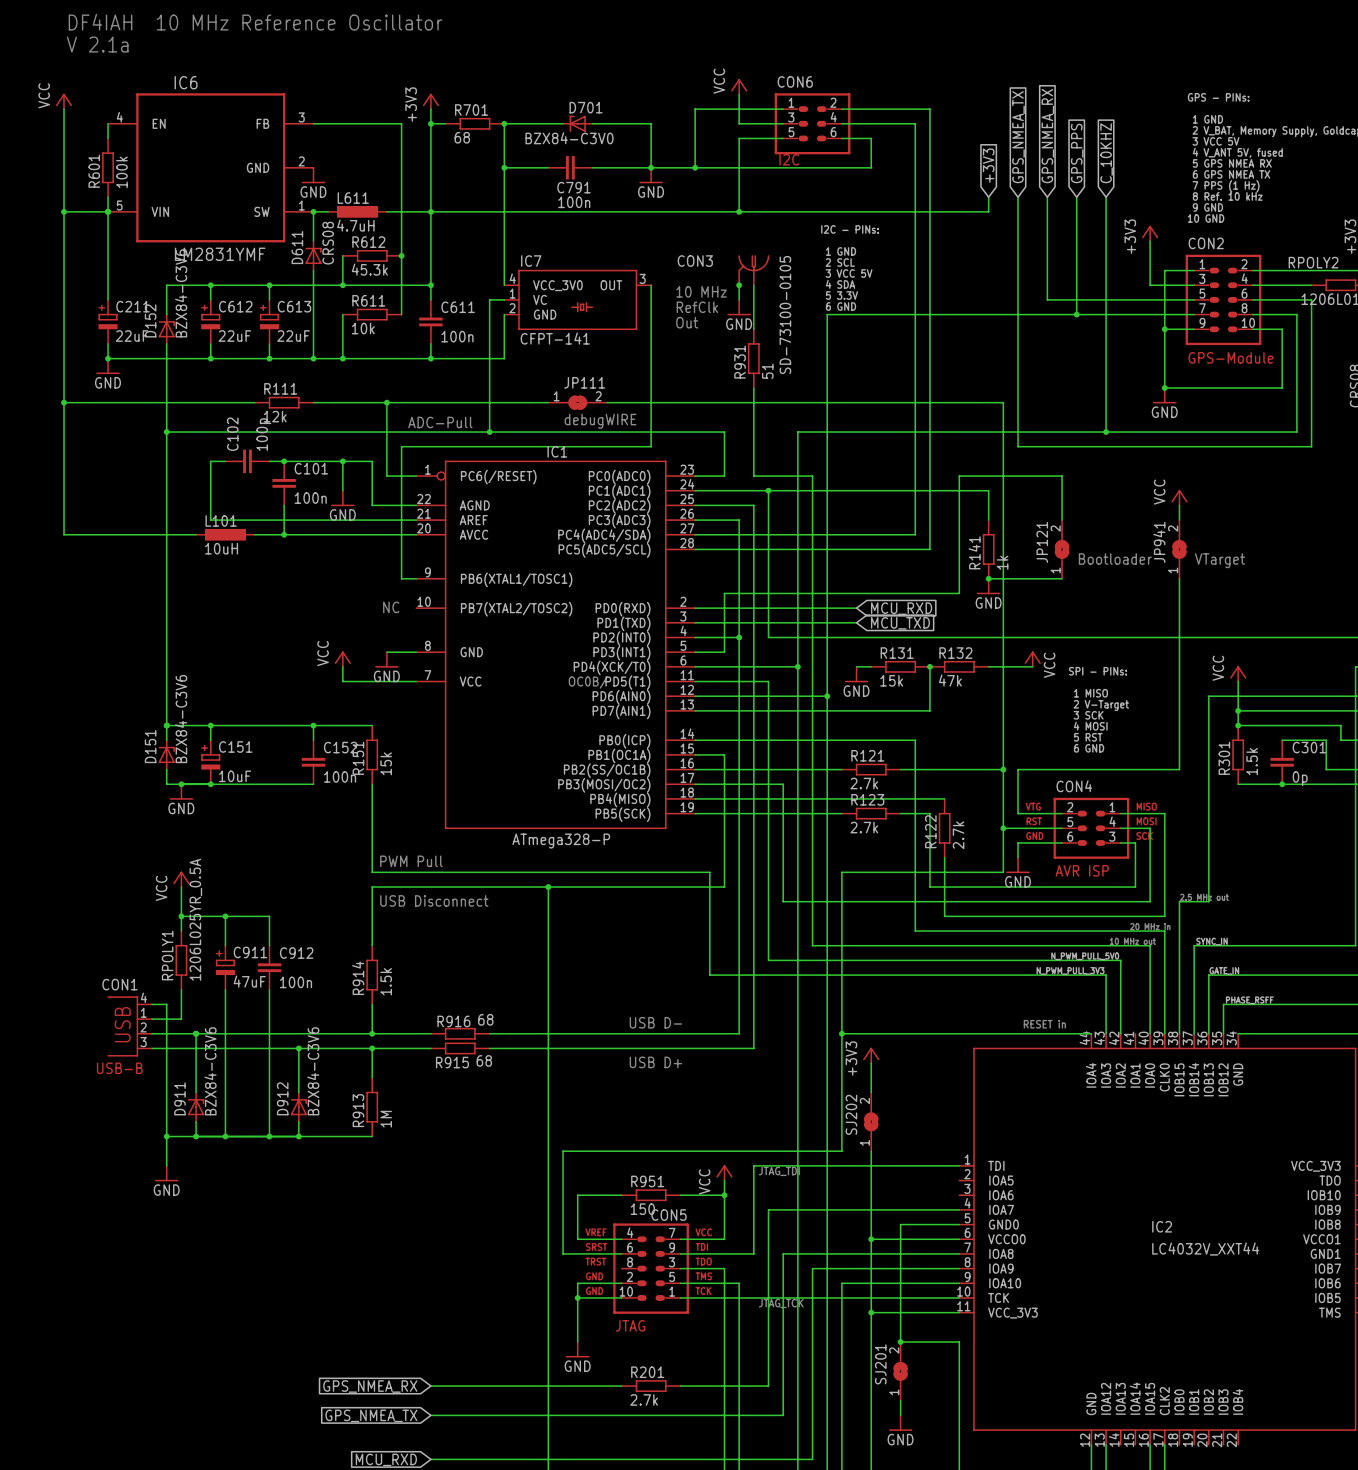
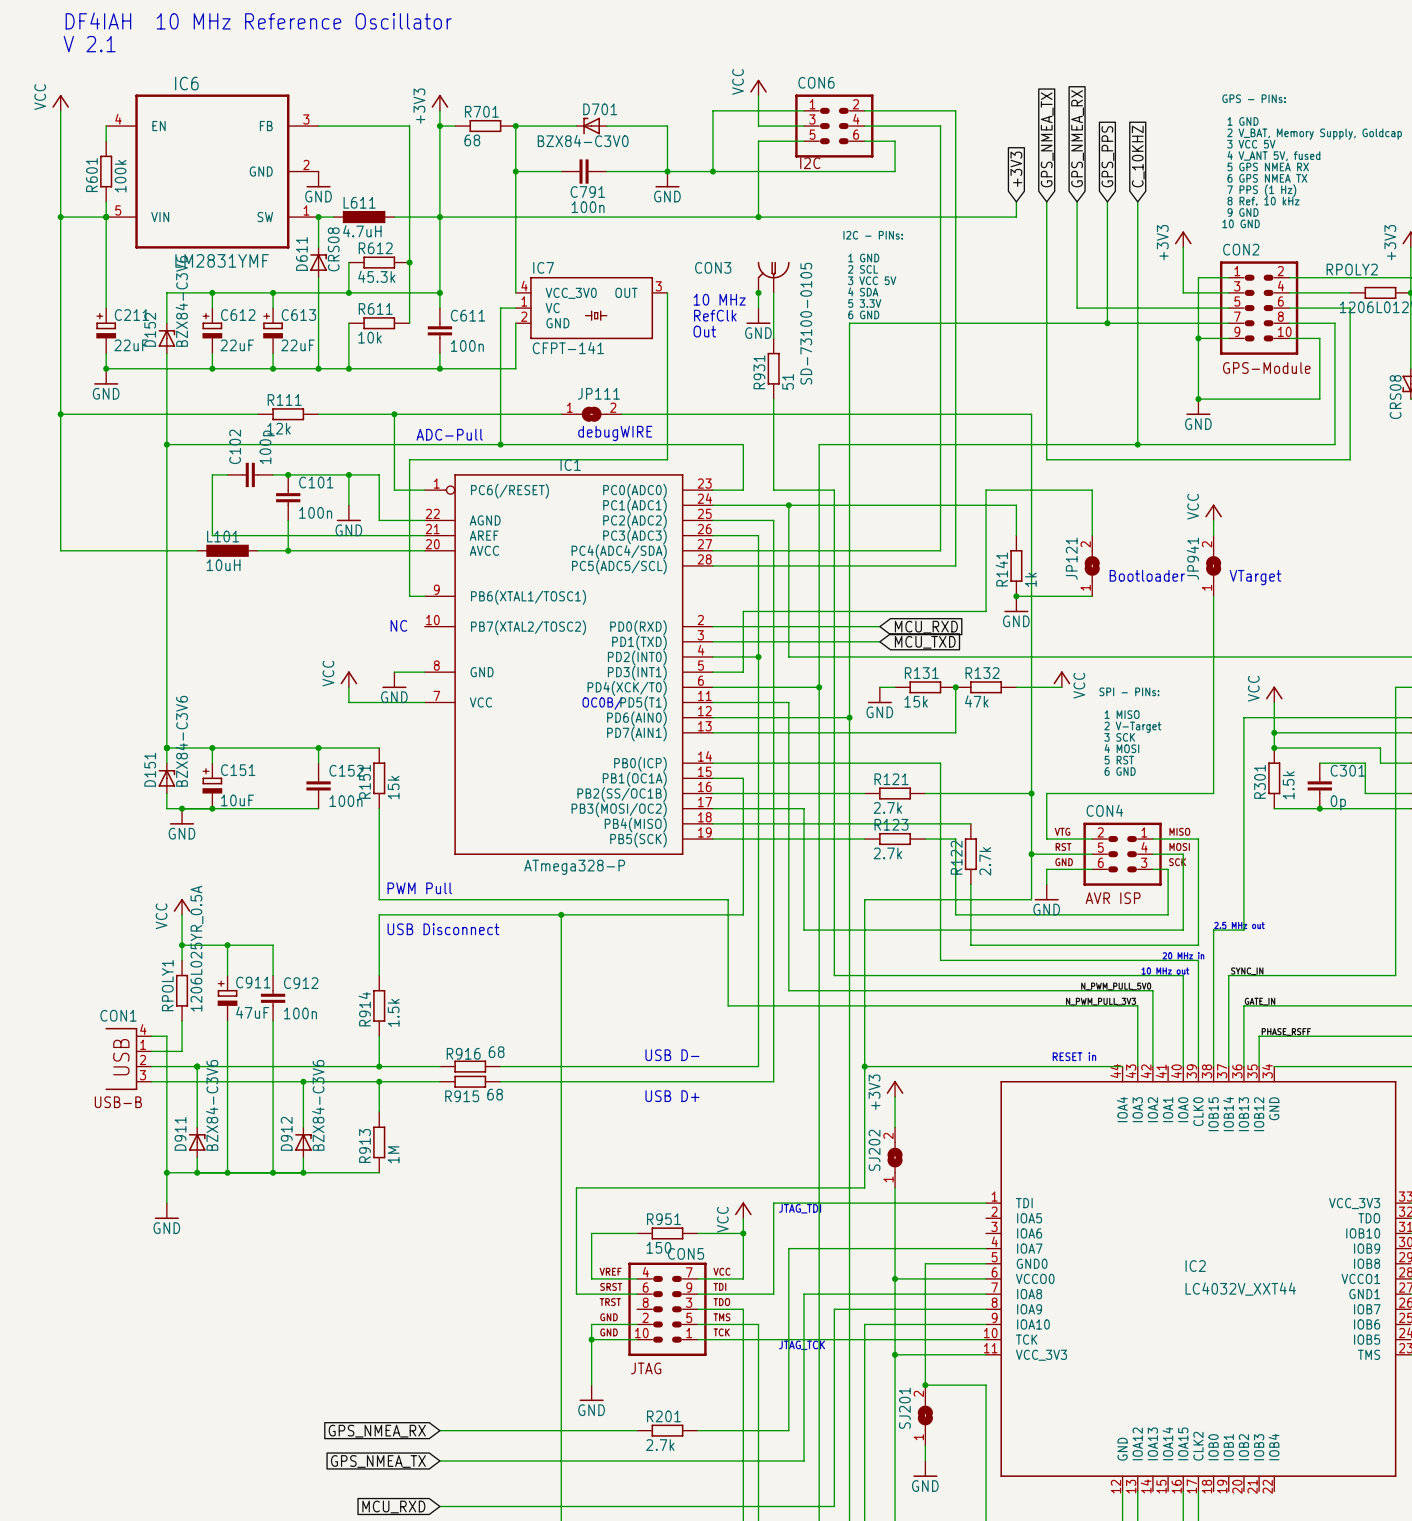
text: V 2.1a (97, 44) -> V 2.1 (89, 44)

